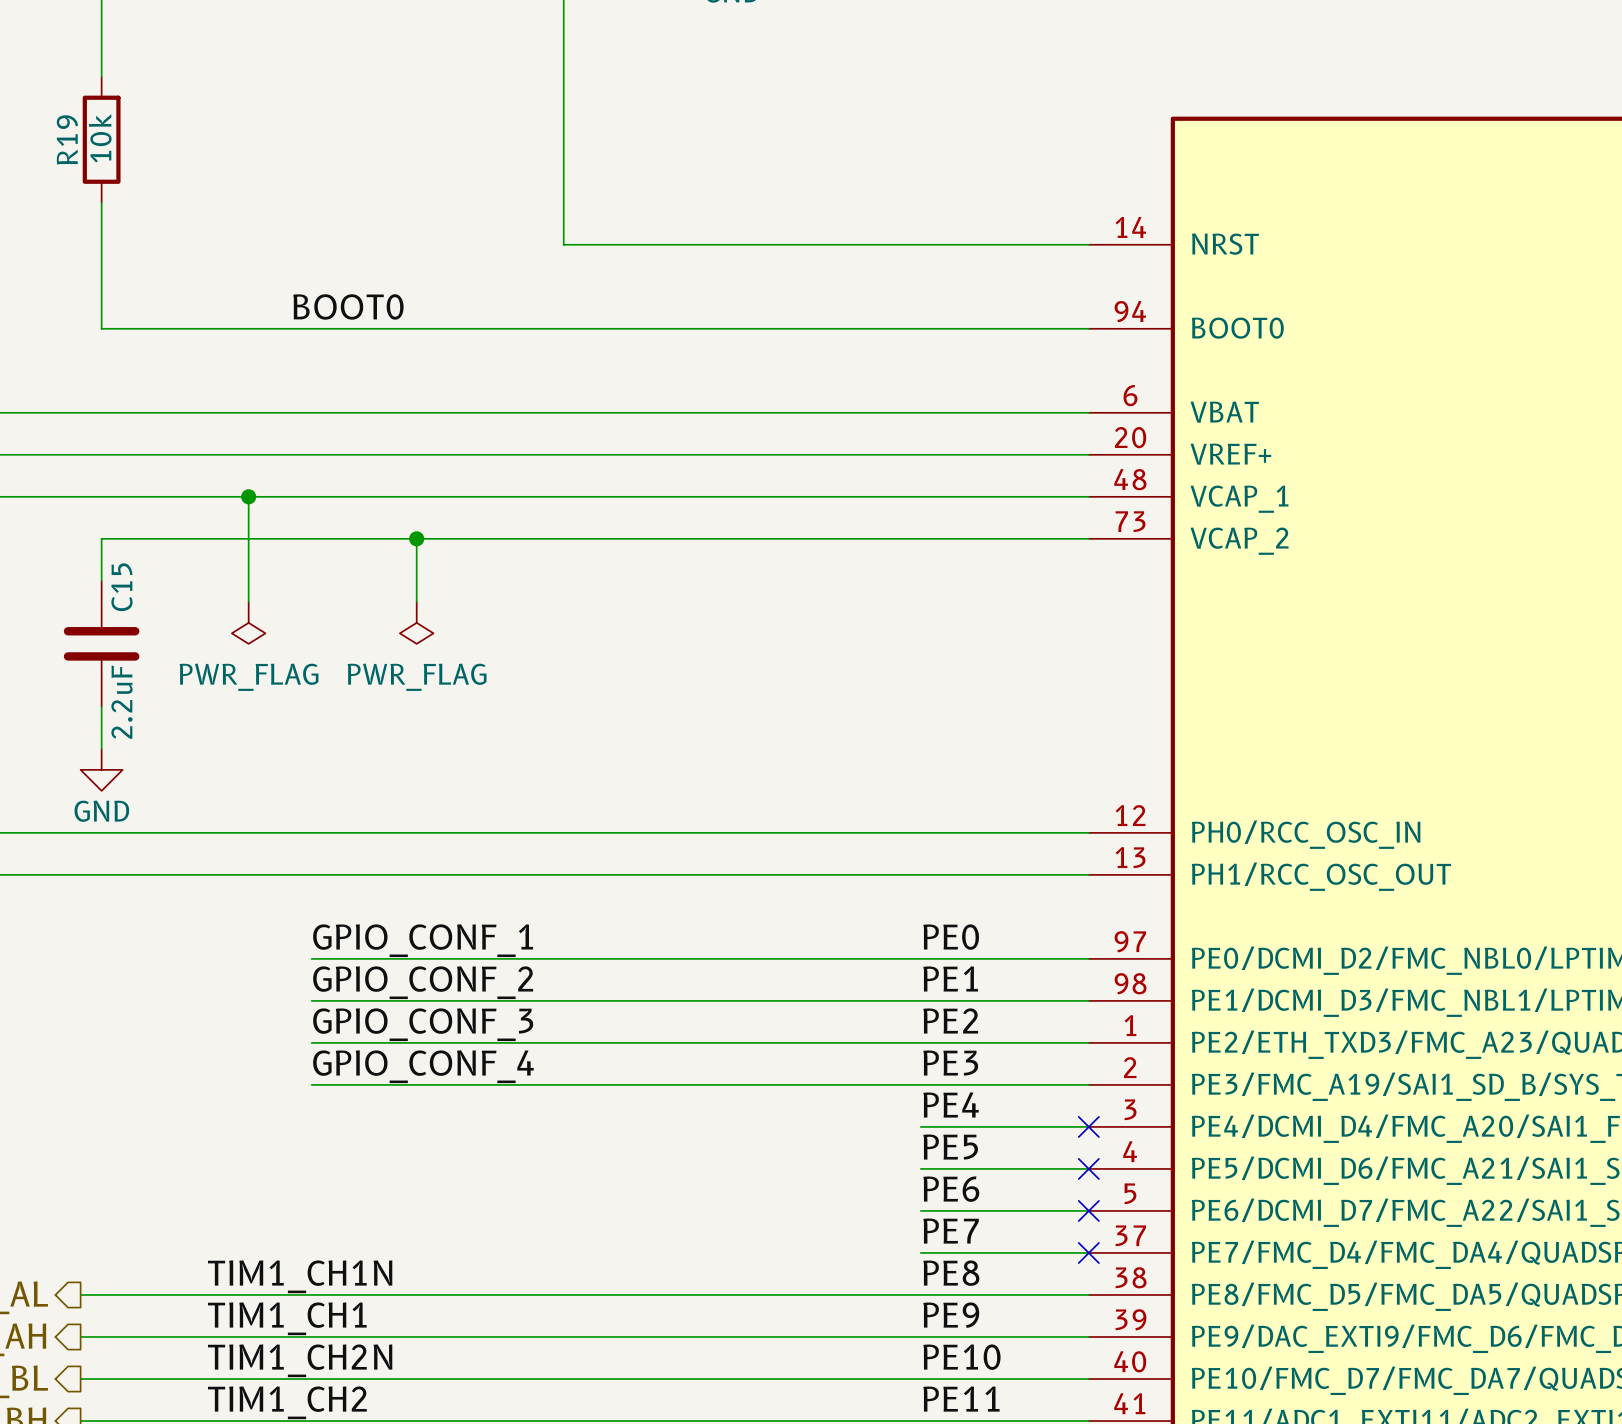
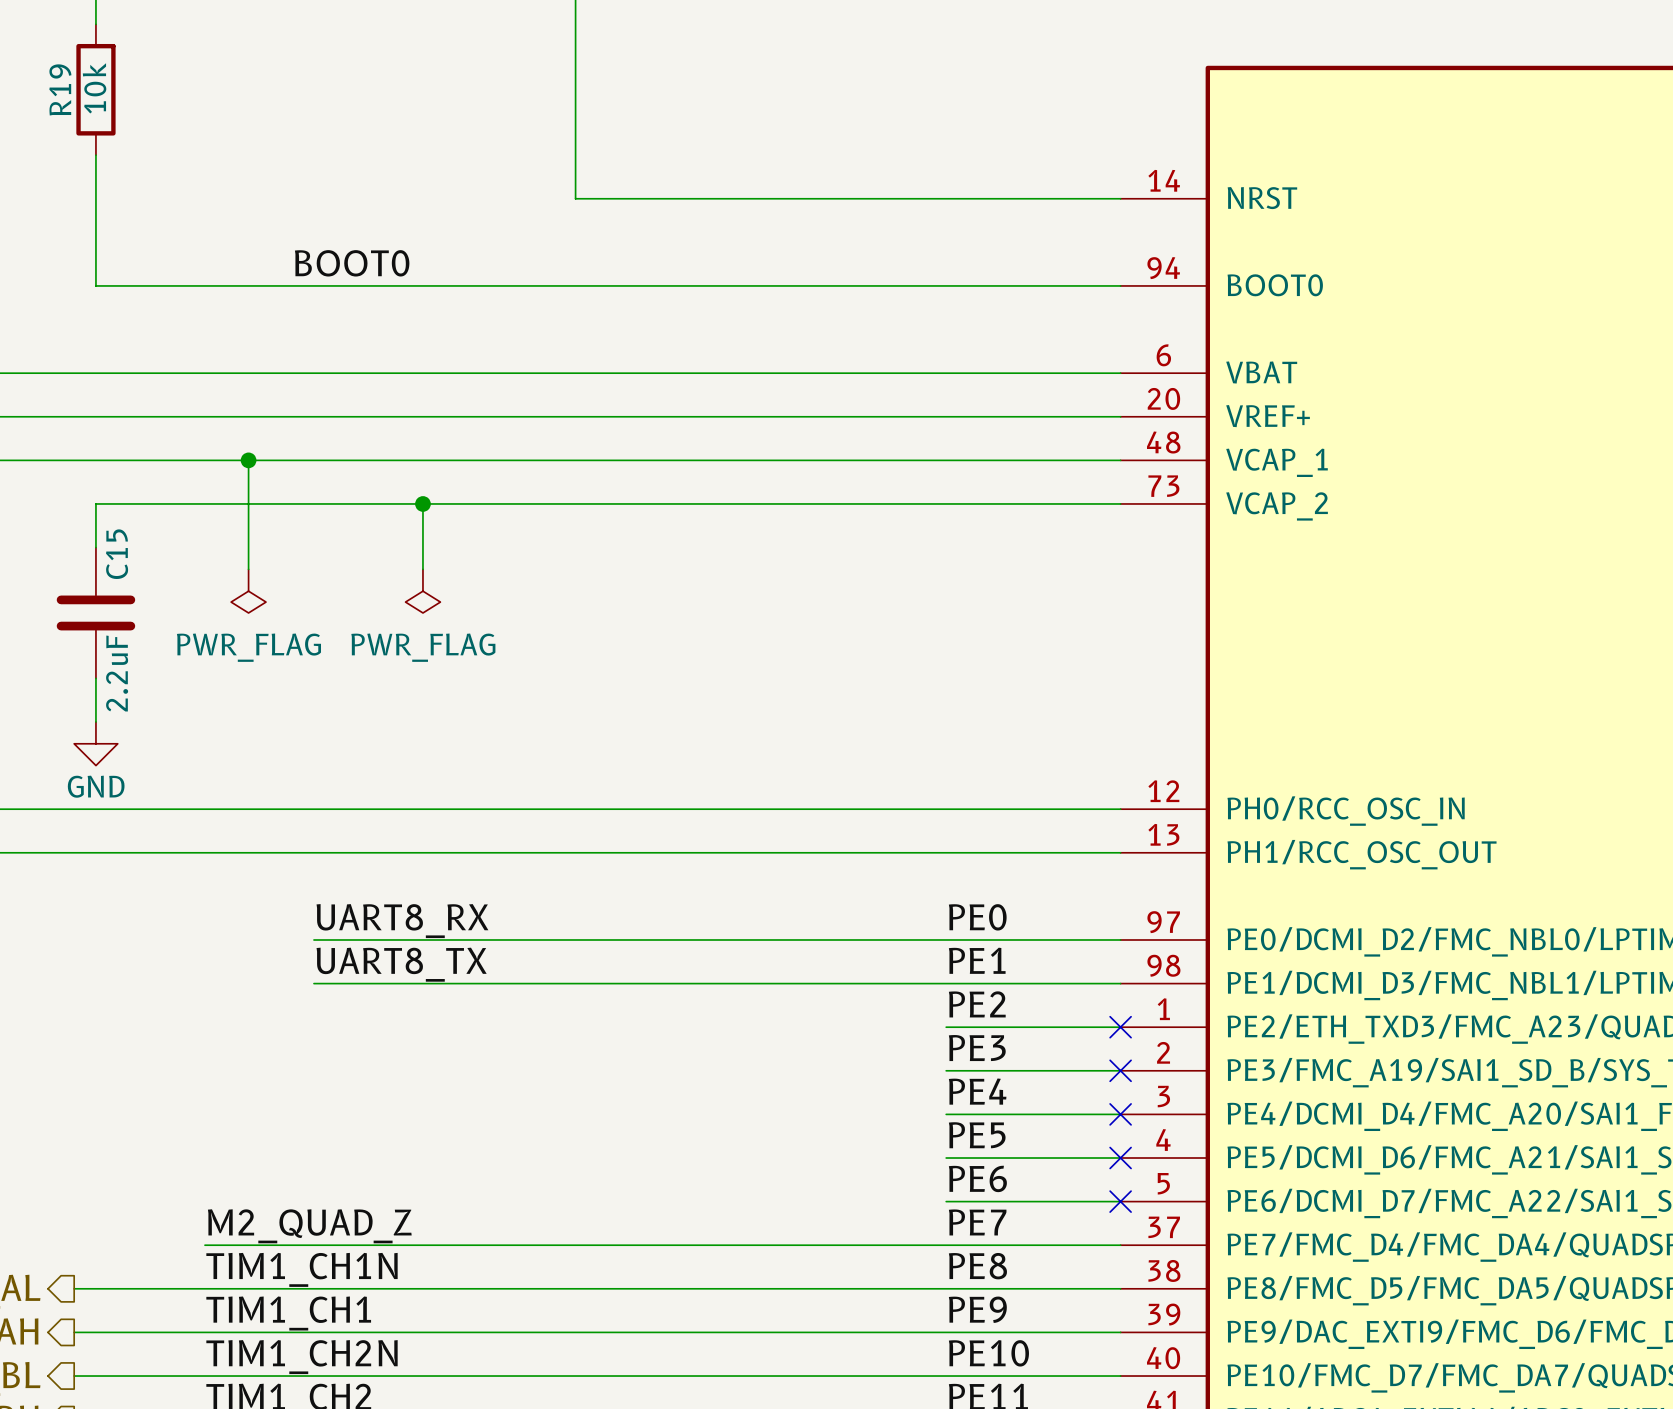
label: GPIO_CONF_1 (423, 940) -> UART8_RX (402, 921)
label: GPIO_CONF_2 (423, 982) -> UART8_TX (401, 964)
label: GPIO_CONF_3 (423, 1024) -> none
wire: (311, 1042) (920, 1042) -> none
no-connect mark: none -> (1120, 1027)
label: GPIO_CONF_4 (423, 1066) -> none
wire: (311, 1084) (920, 1084) -> none
no-connect mark: none -> (1120, 1070)
label: none -> M2_QUAD_Z (309, 1226)
wire: none -> (204, 1245) (946, 1245)
no-connect mark: (1088, 1252) -> none

